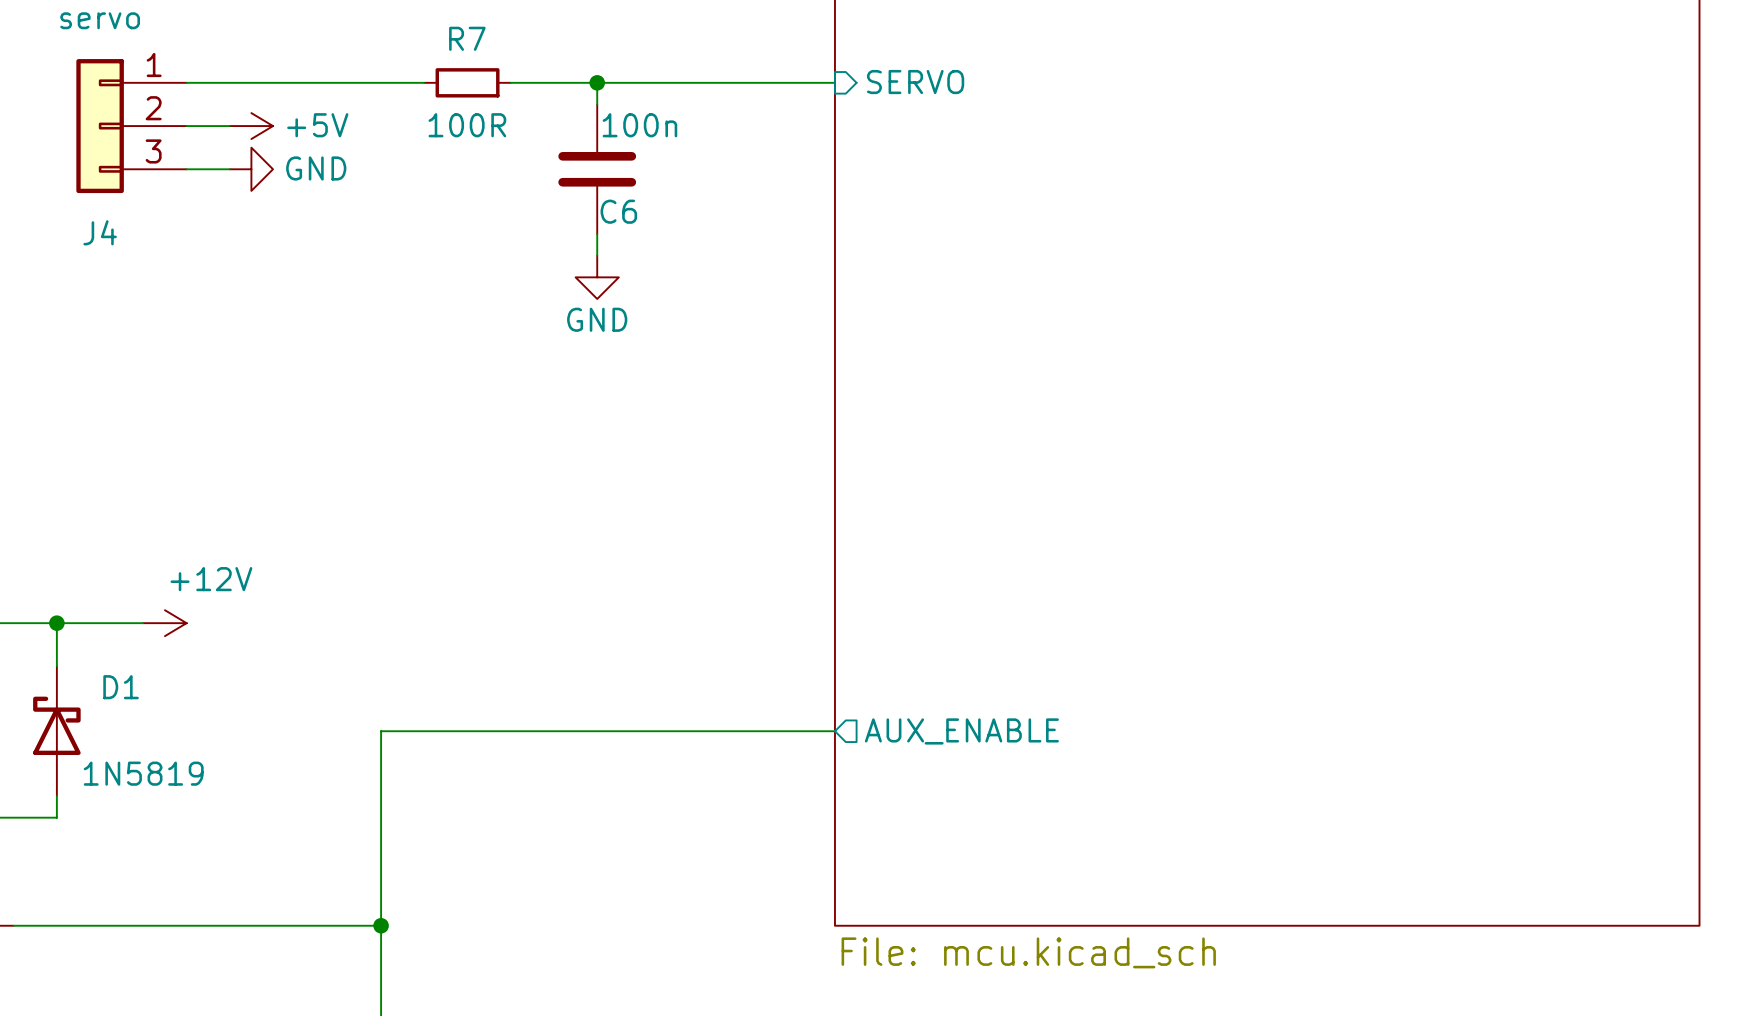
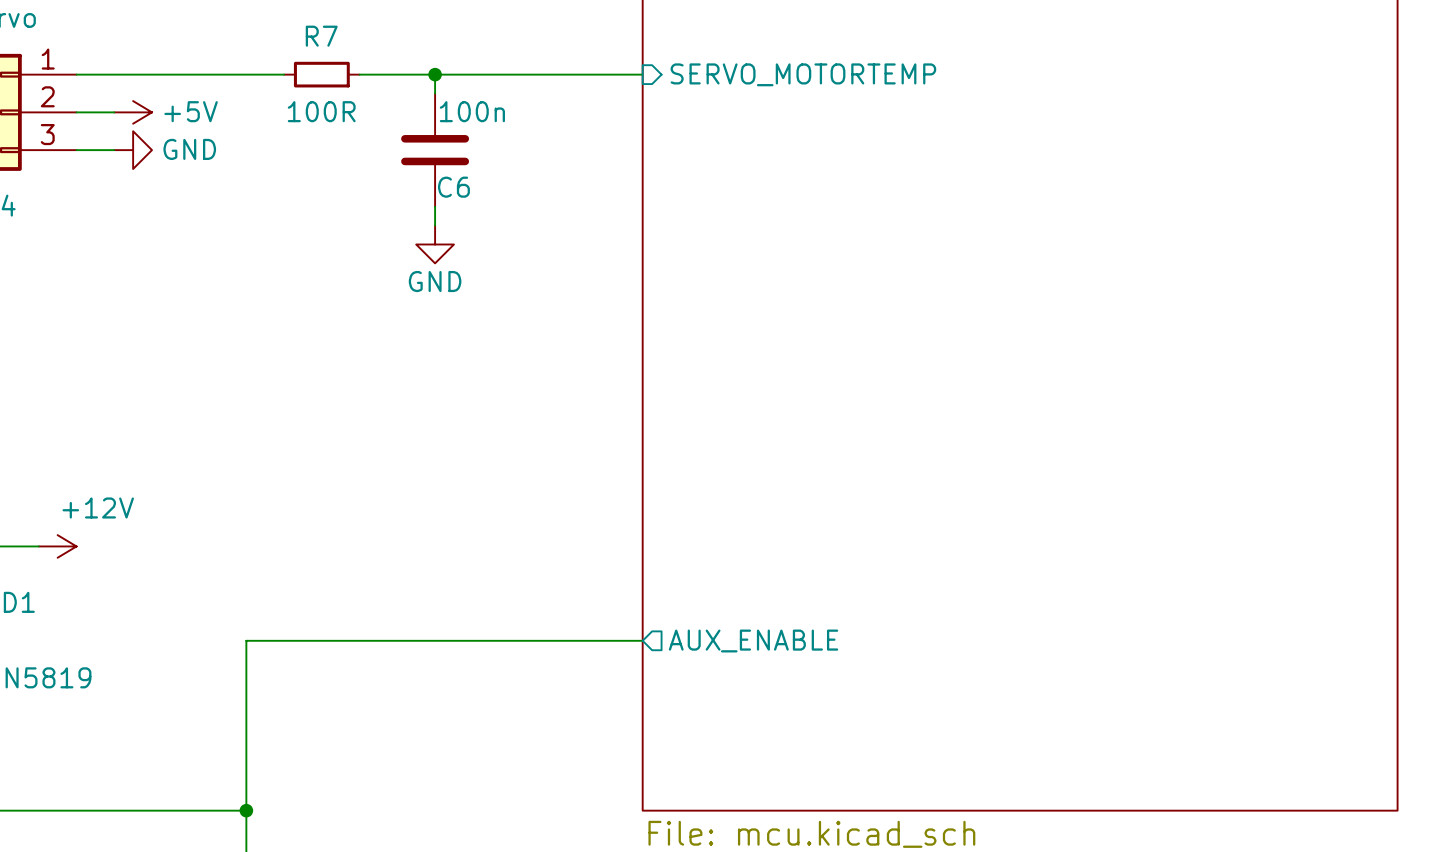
sheet pin: SERVO (915, 82) -> SERVO_MOTORTEMP (803, 74)

